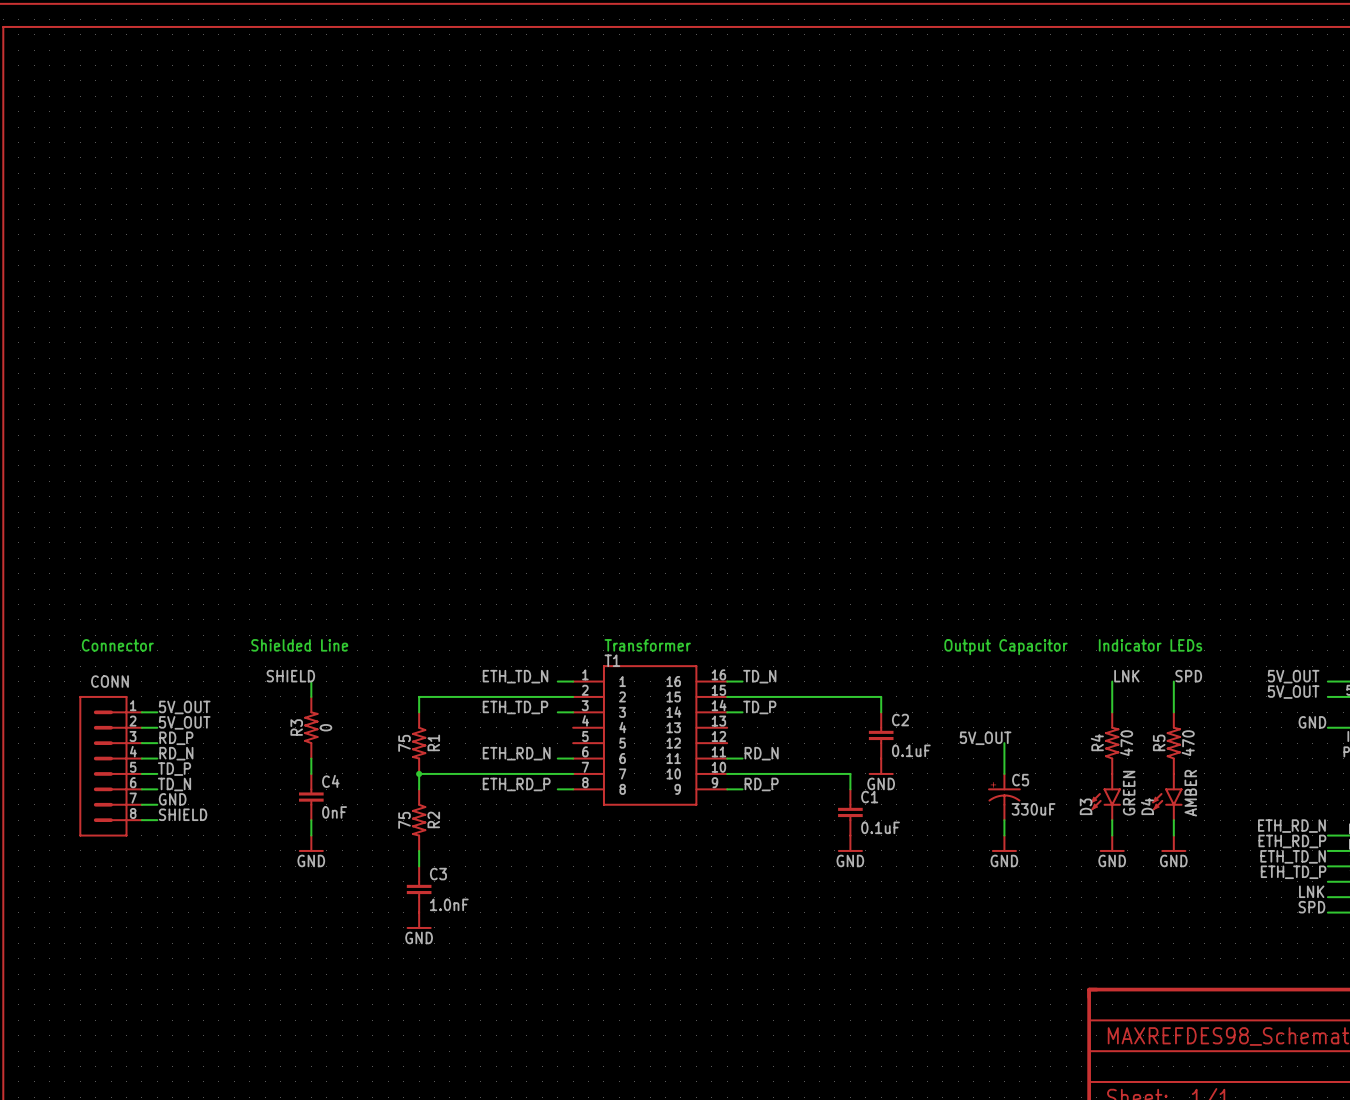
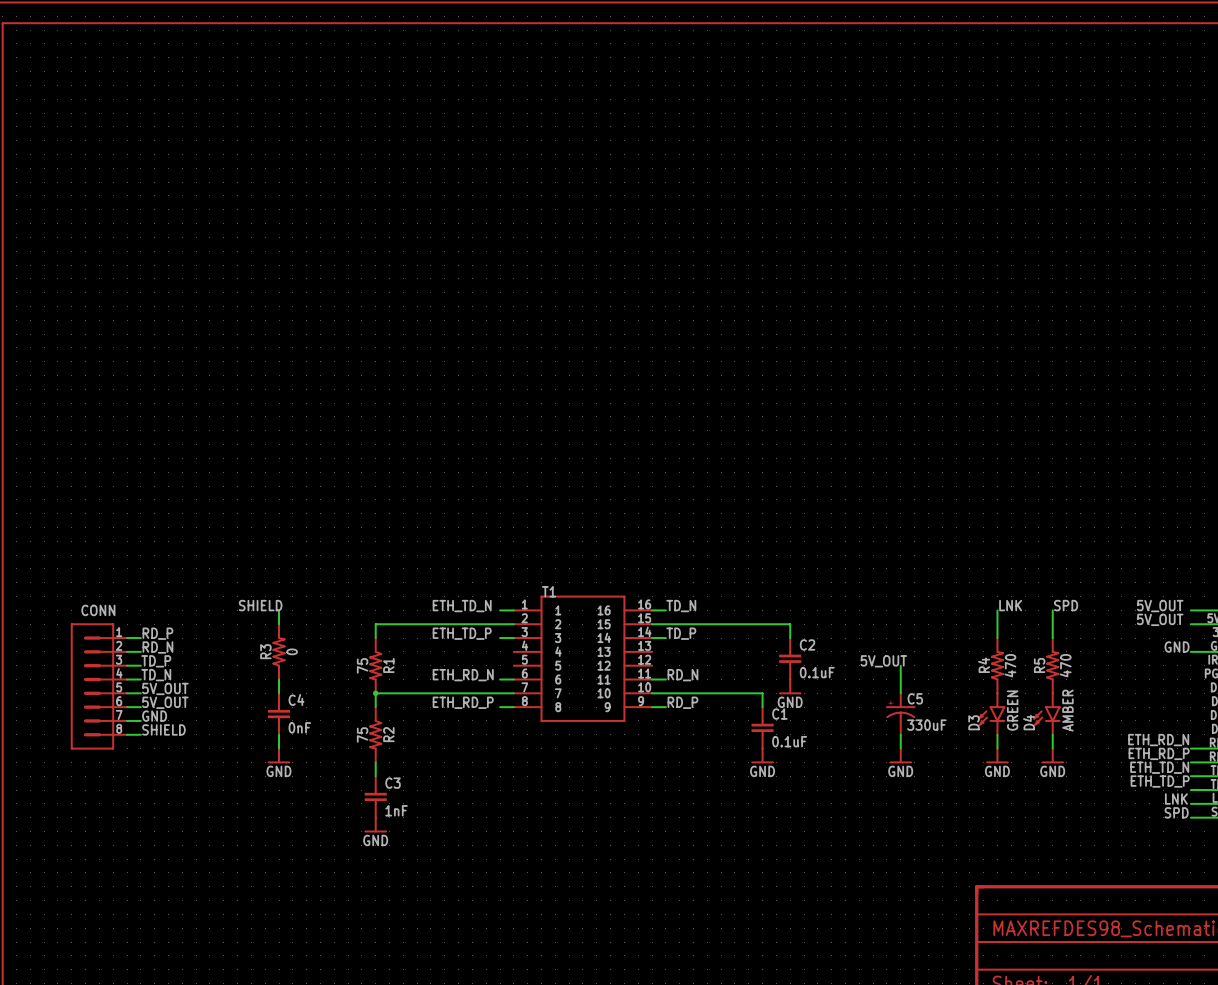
text: Connector (117, 645) -> none
text: Shielded Line (299, 645) -> none
text: Transformer (647, 645) -> none
text: Indicator LEDs (1150, 645) -> none
text: Output Capacitor (1005, 647) -> none
label: 5V_OUT (184, 707) -> RD_P (157, 633)
label: 5V_OUT (184, 722) -> RD_N (157, 647)
label: RD_P (176, 738) -> TD_P (156, 661)
label: RD_N (176, 753) -> TD_N (156, 675)
label: TD_P (174, 769) -> 5V_OUT (165, 688)
label: TD_N (174, 784) -> 5V_OUT (165, 702)
C3 value: 1.0nF (449, 904) -> 1nF (396, 810)

